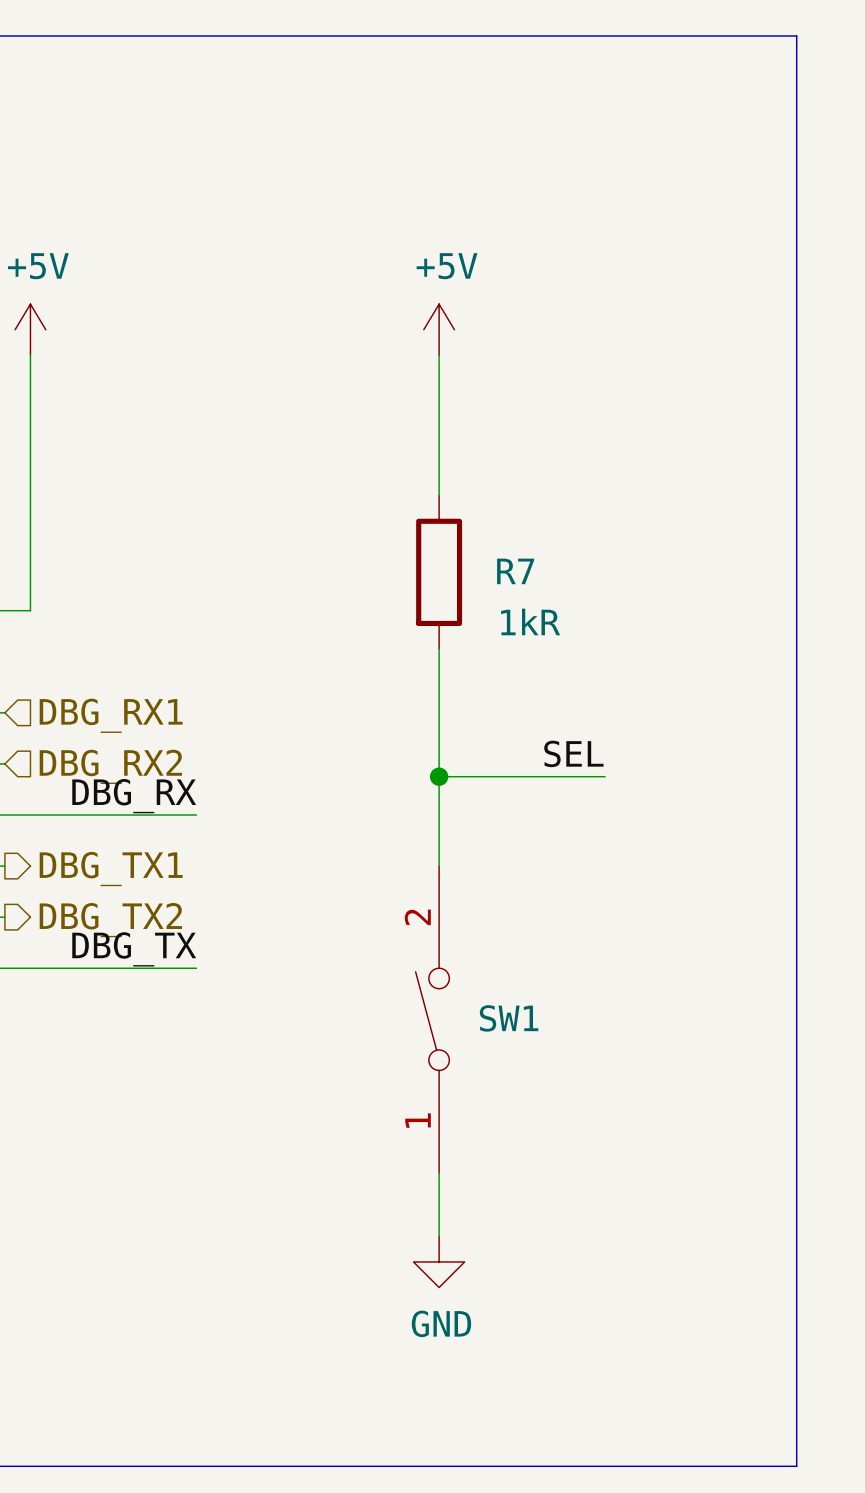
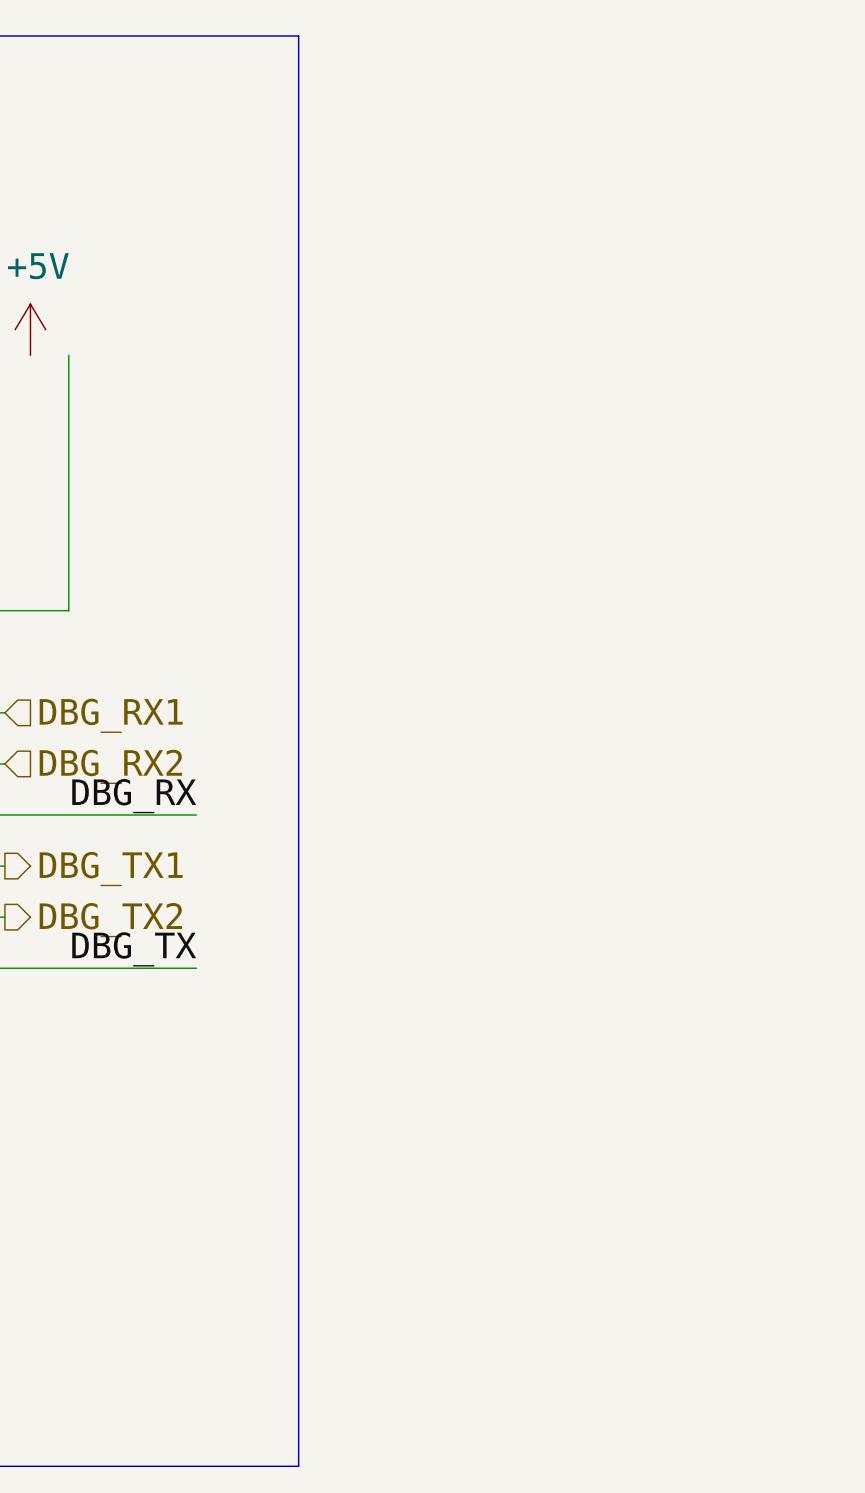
line: (298, 36) (796, 36) (796, 1466) (298, 1466) -> (298, 36) (298, 1466)
power symbol: +5V (439, 329) -> none
wire: (30, 355) (30, 610) -> (68, 355) (68, 610) (30, 610)
wire: (439, 355) (439, 495) -> none
R7: 1kR (439, 572) -> none
wire: (439, 648) (439, 866) -> none
label: SEL (573, 753) -> none
wire: (439, 776) (605, 776) -> none
junction: (439, 776) -> none
SW1: (432, 1019) -> none
wire: (439, 1172) (439, 1236) -> none
power symbol: GND (439, 1261) -> none

